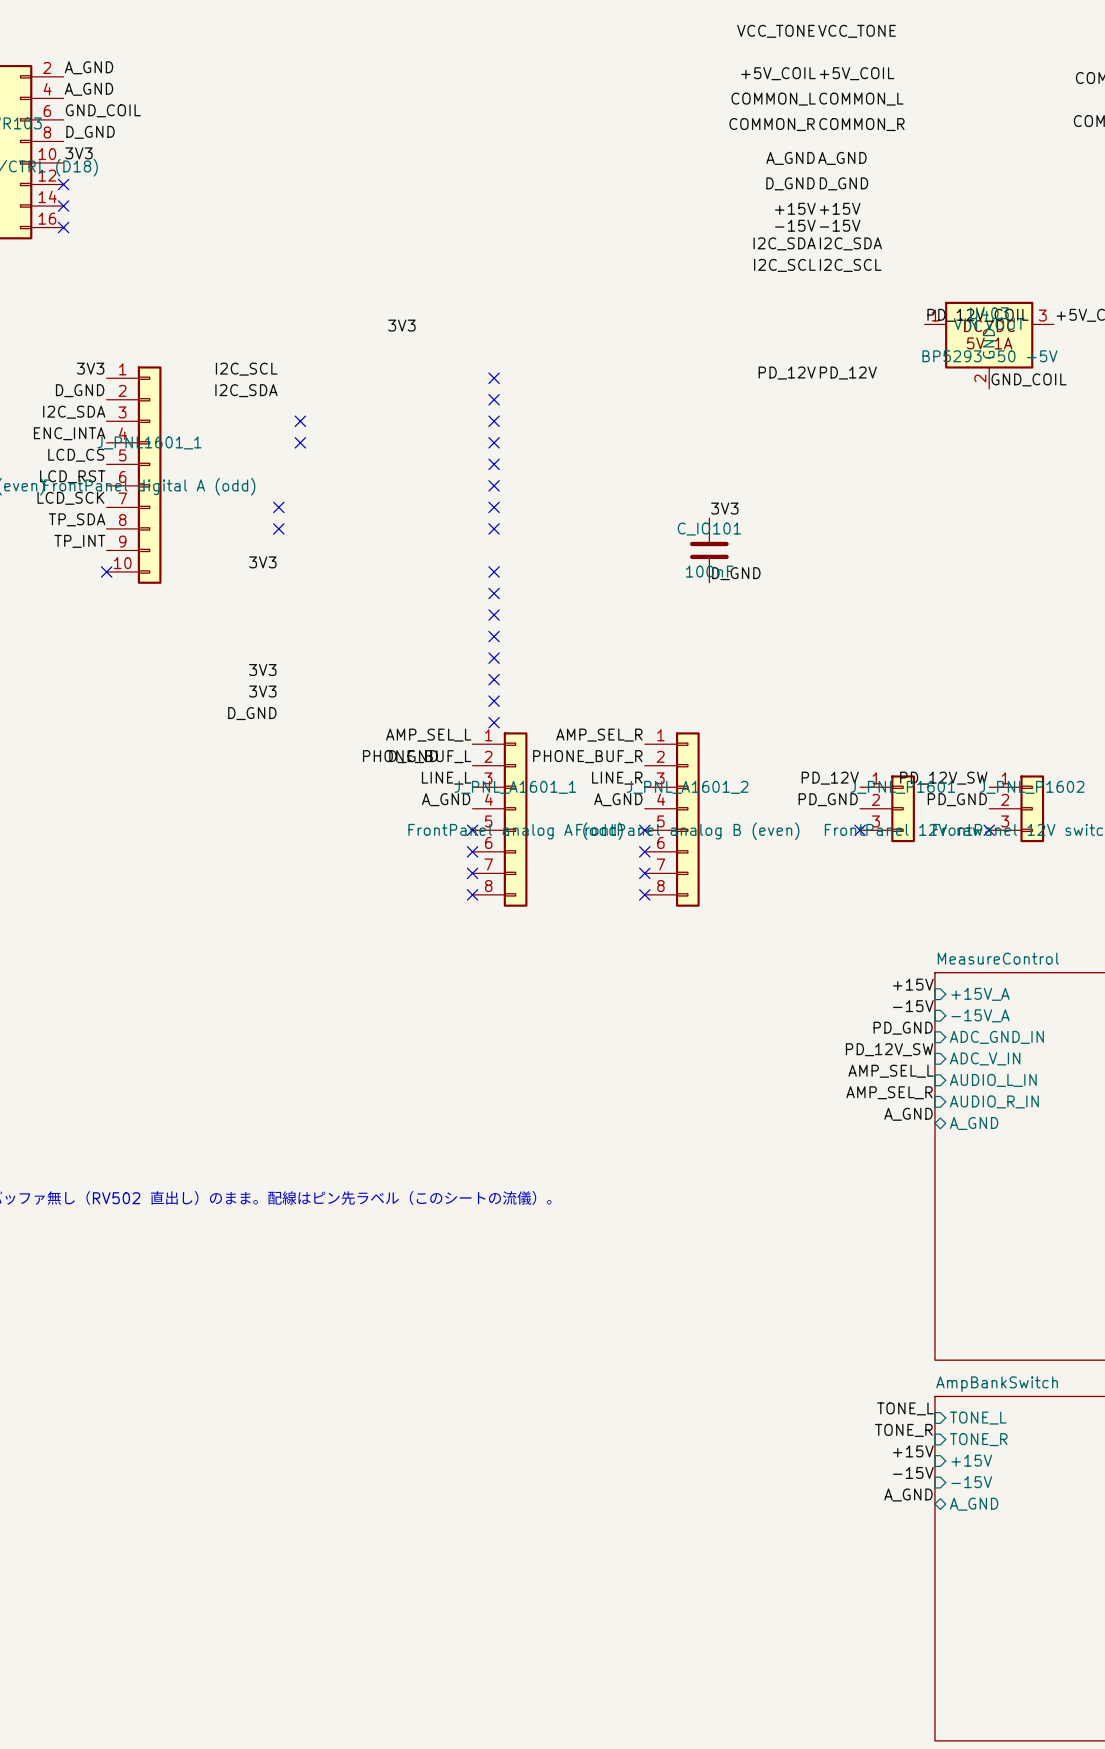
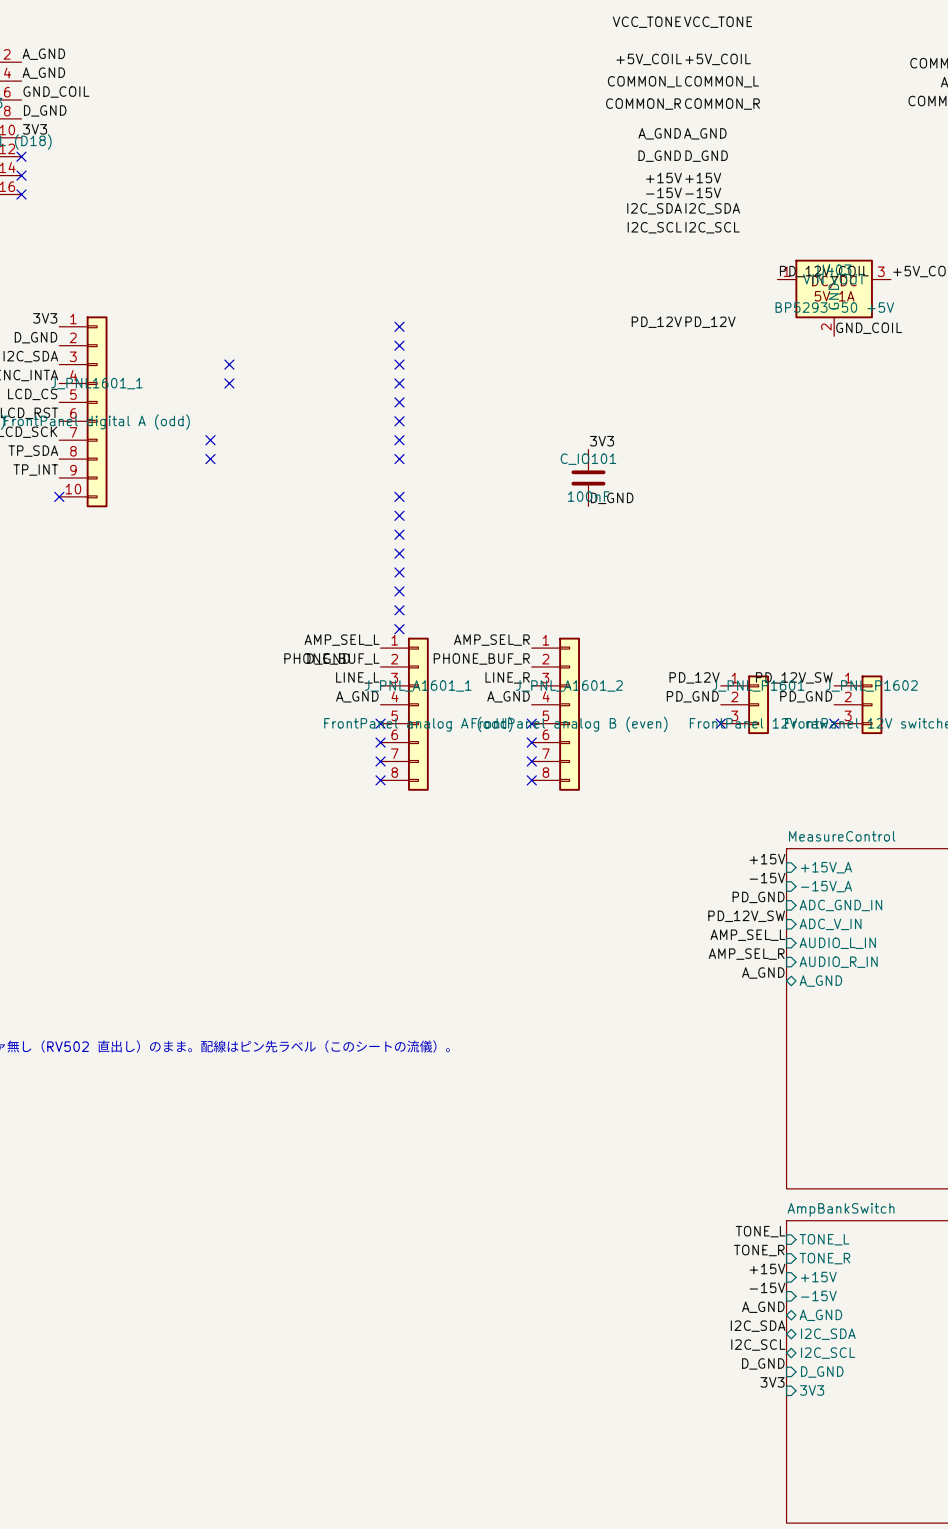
label: 3V3 (401, 325) -> none
label: I2C_SCL (246, 369) -> none
label: I2C_SDA (246, 390) -> none
label: 3V3 (262, 562) -> none
label: 3V3 (262, 670) -> none
label: 3V3 (262, 691) -> none
label: D_GND (252, 713) -> none
label: none -> I2C_SDA (758, 1326)
sheet pin: none -> I2C_SDA (828, 1334)
label: none -> I2C_SCL (758, 1345)
sheet pin: none -> I2C_SCL (828, 1353)
label: none -> D_GND (763, 1363)
sheet pin: none -> D_GND (822, 1372)
label: none -> 3V3 (772, 1382)
sheet pin: none -> 3V3 (812, 1390)

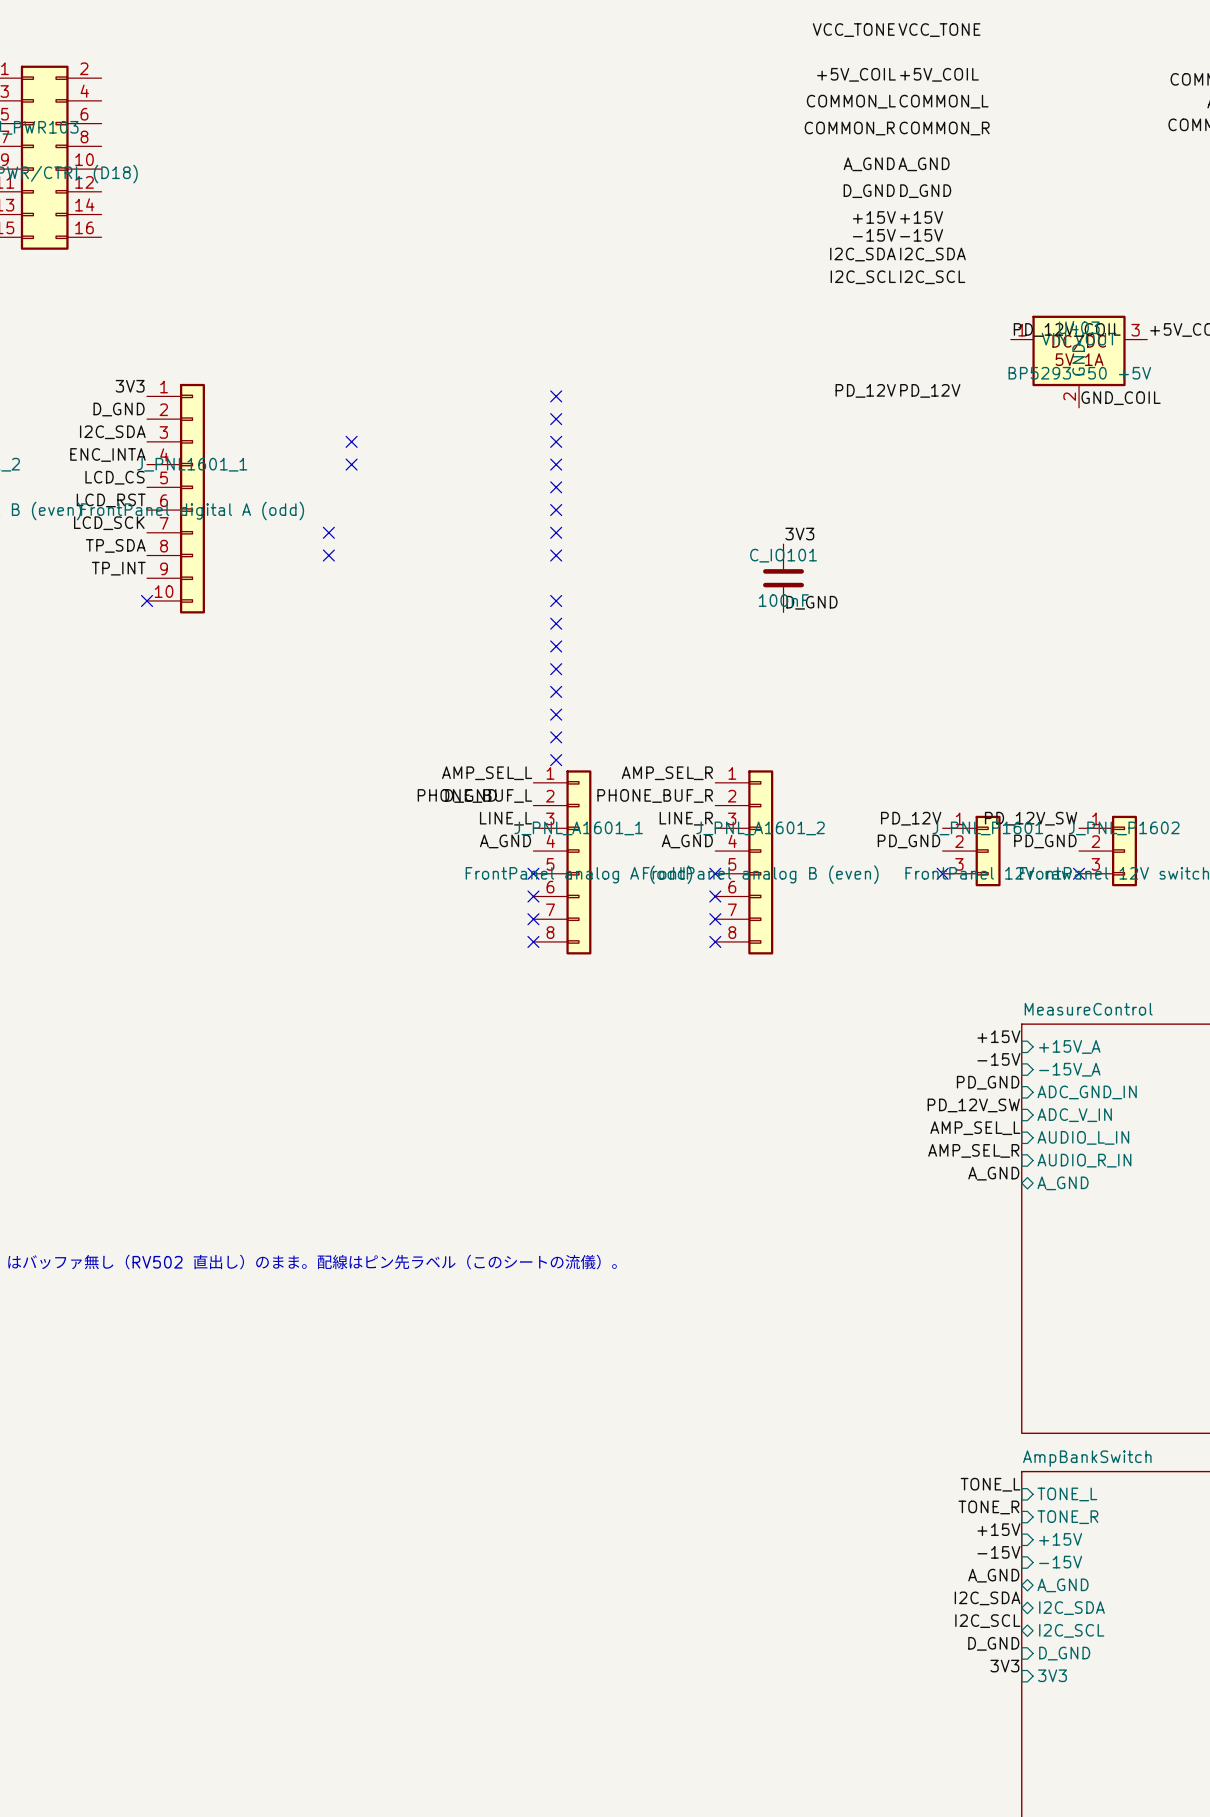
label: A_GND (43, 54) -> none
label: A_GND (43, 73) -> none
label: GND_COIL (56, 92) -> none
label: D_GND (45, 110) -> none
label: 3V3 (35, 129) -> none
no-connect mark: (21, 156) -> none
no-connect mark: (21, 175) -> none
no-connect mark: (21, 194) -> none

